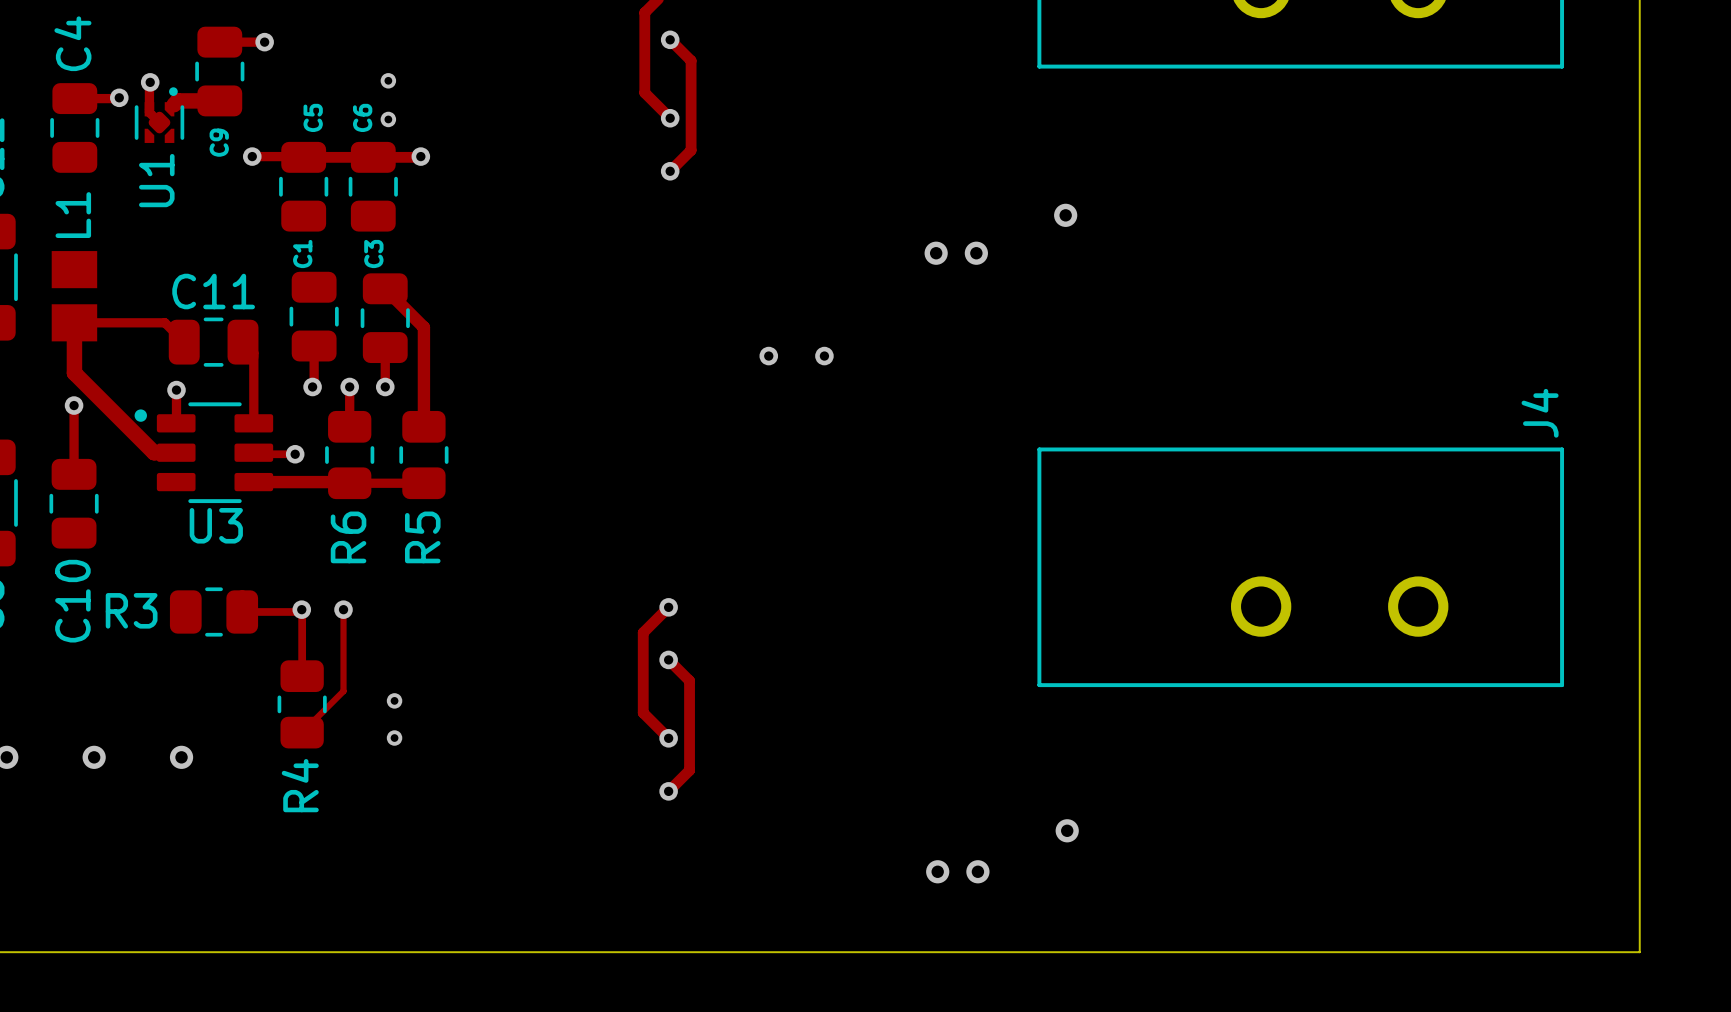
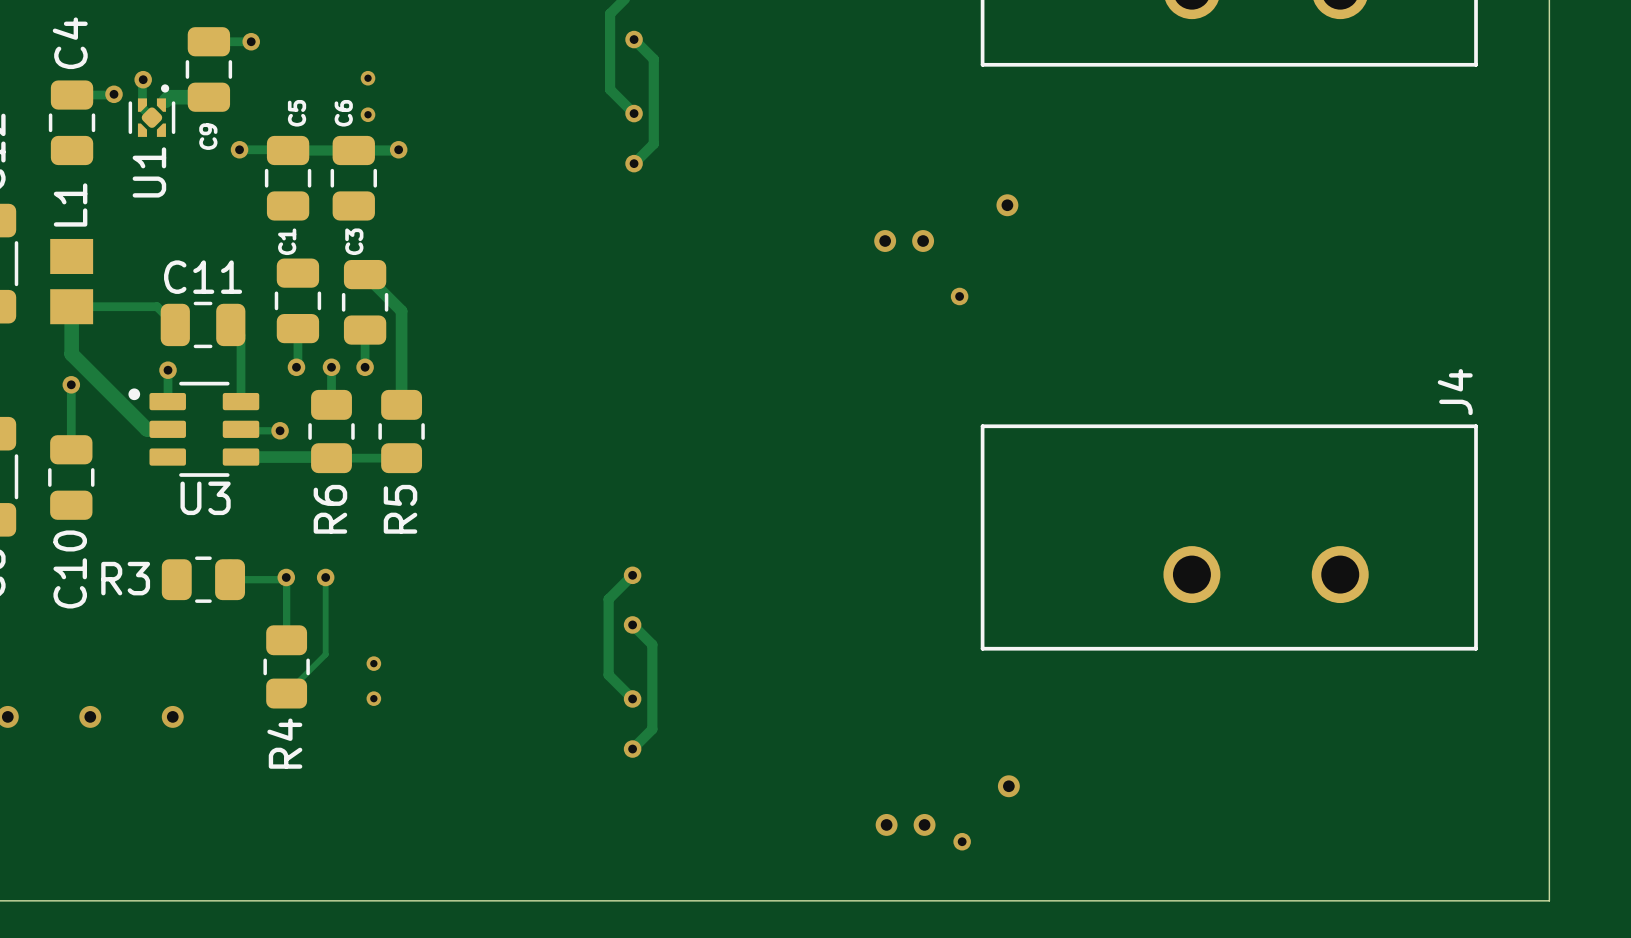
via: none -> (959, 296)
via: (768, 356) -> none
via: (824, 356) -> none
via: none -> (962, 841)

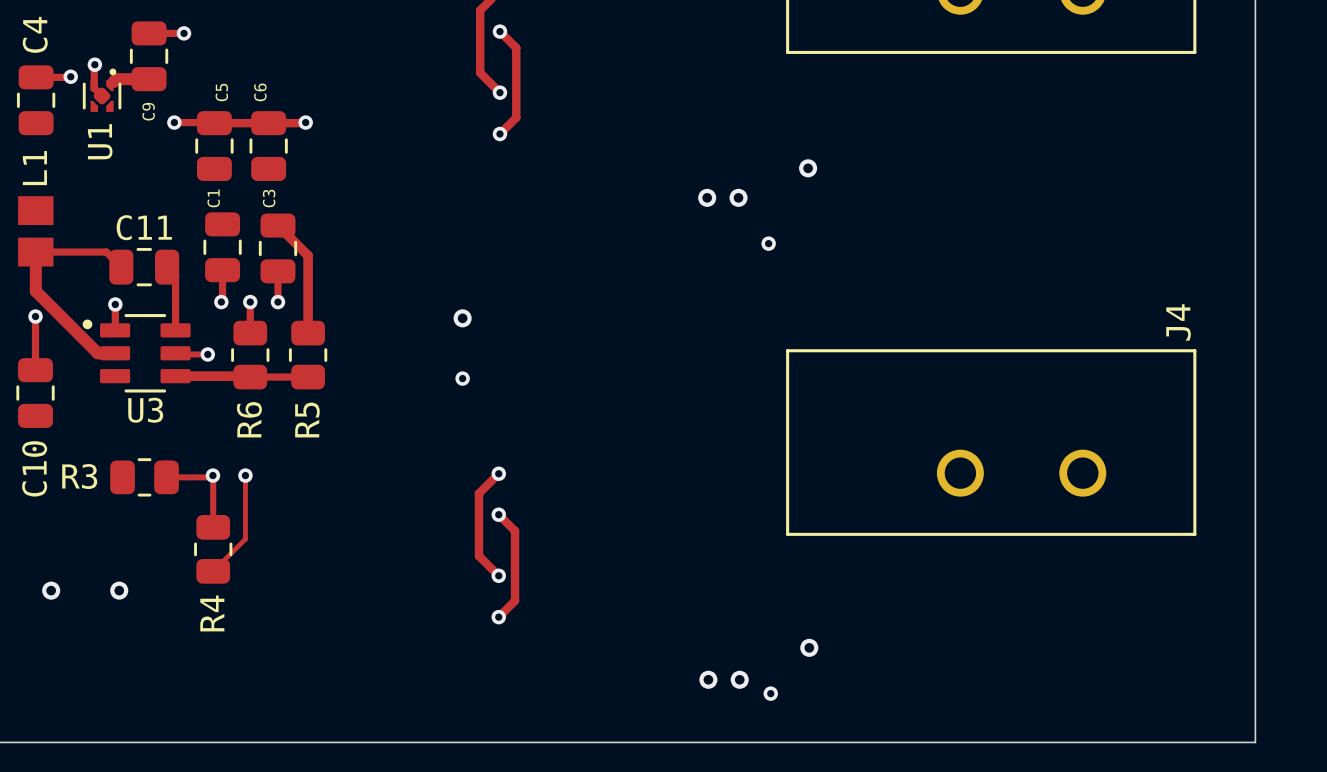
via: (368, 78) -> none
via: (368, 114) -> none
via: none -> (462, 318)
via: none -> (462, 378)
via: (373, 663) -> none
via: (373, 698) -> none

